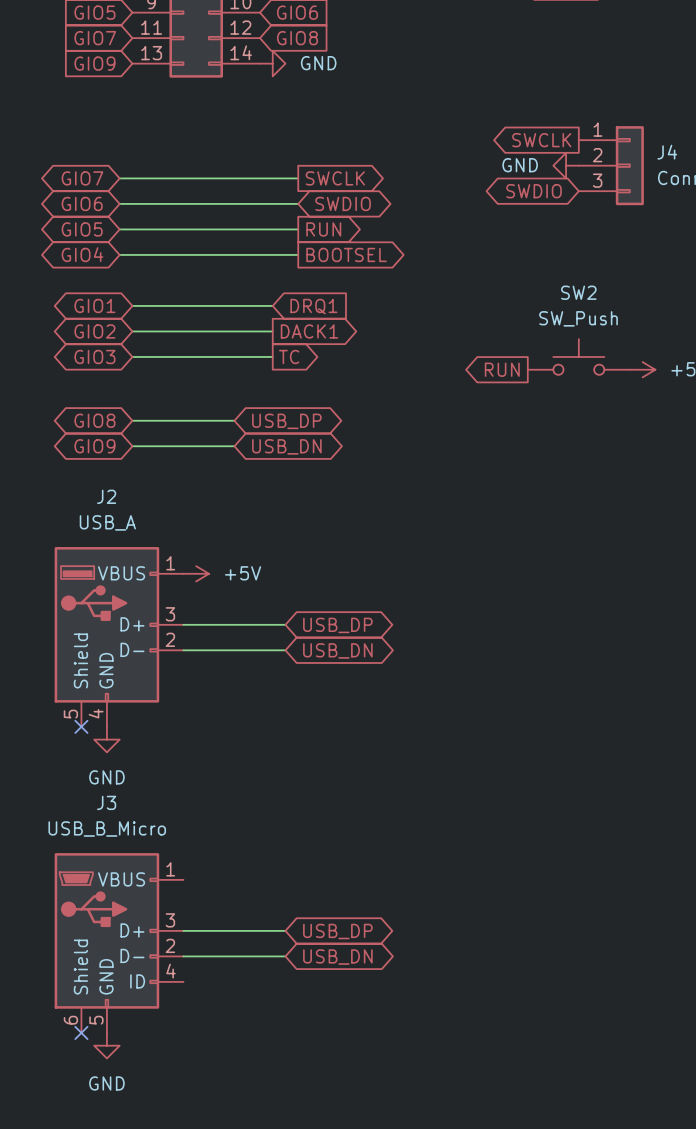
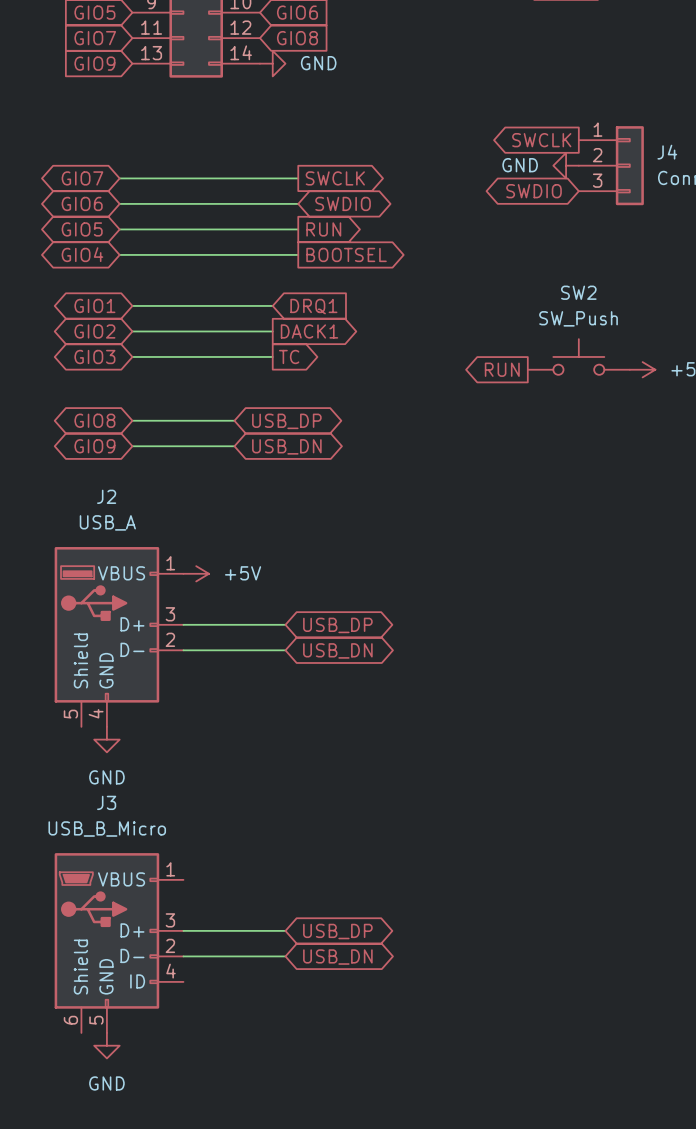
no-connect mark: (81, 726) -> none
no-connect mark: (81, 1032) -> none

